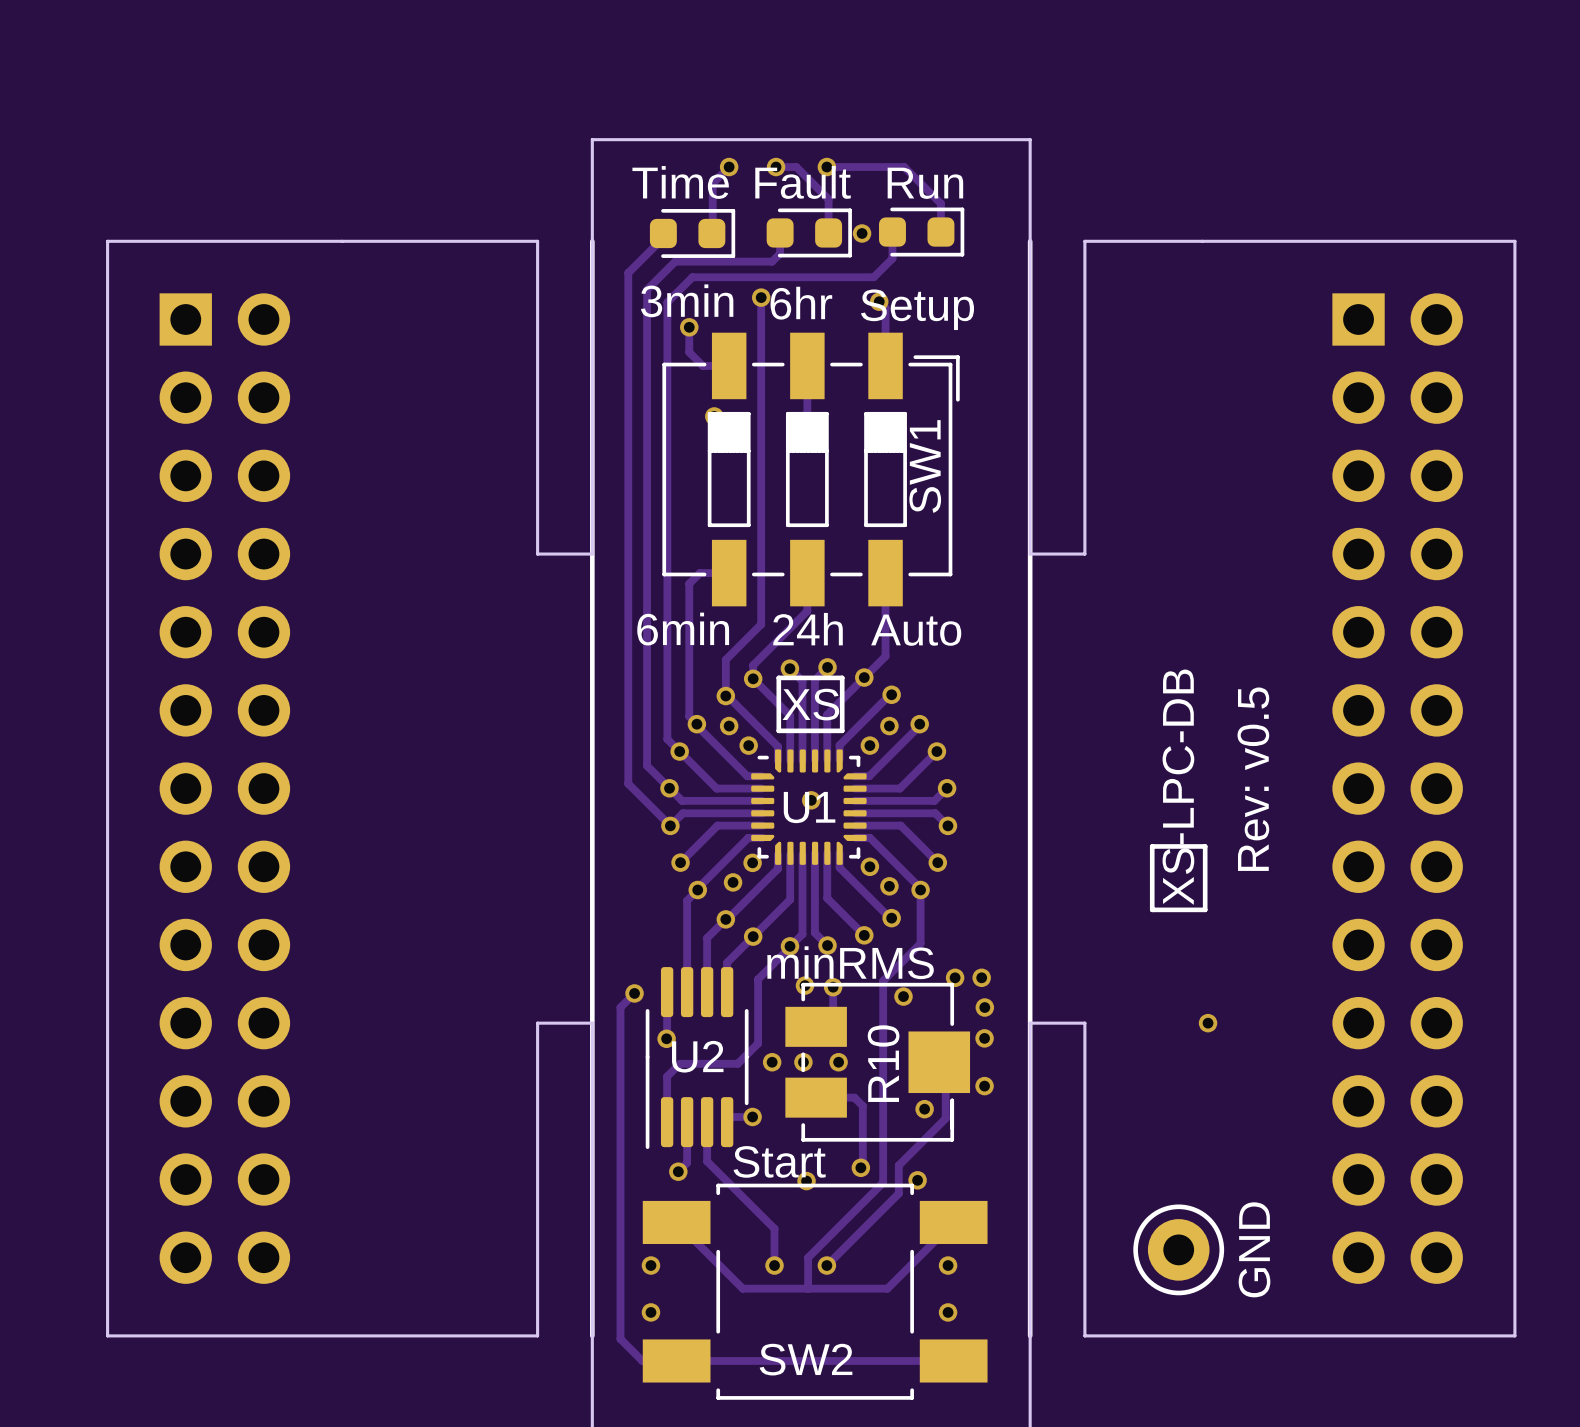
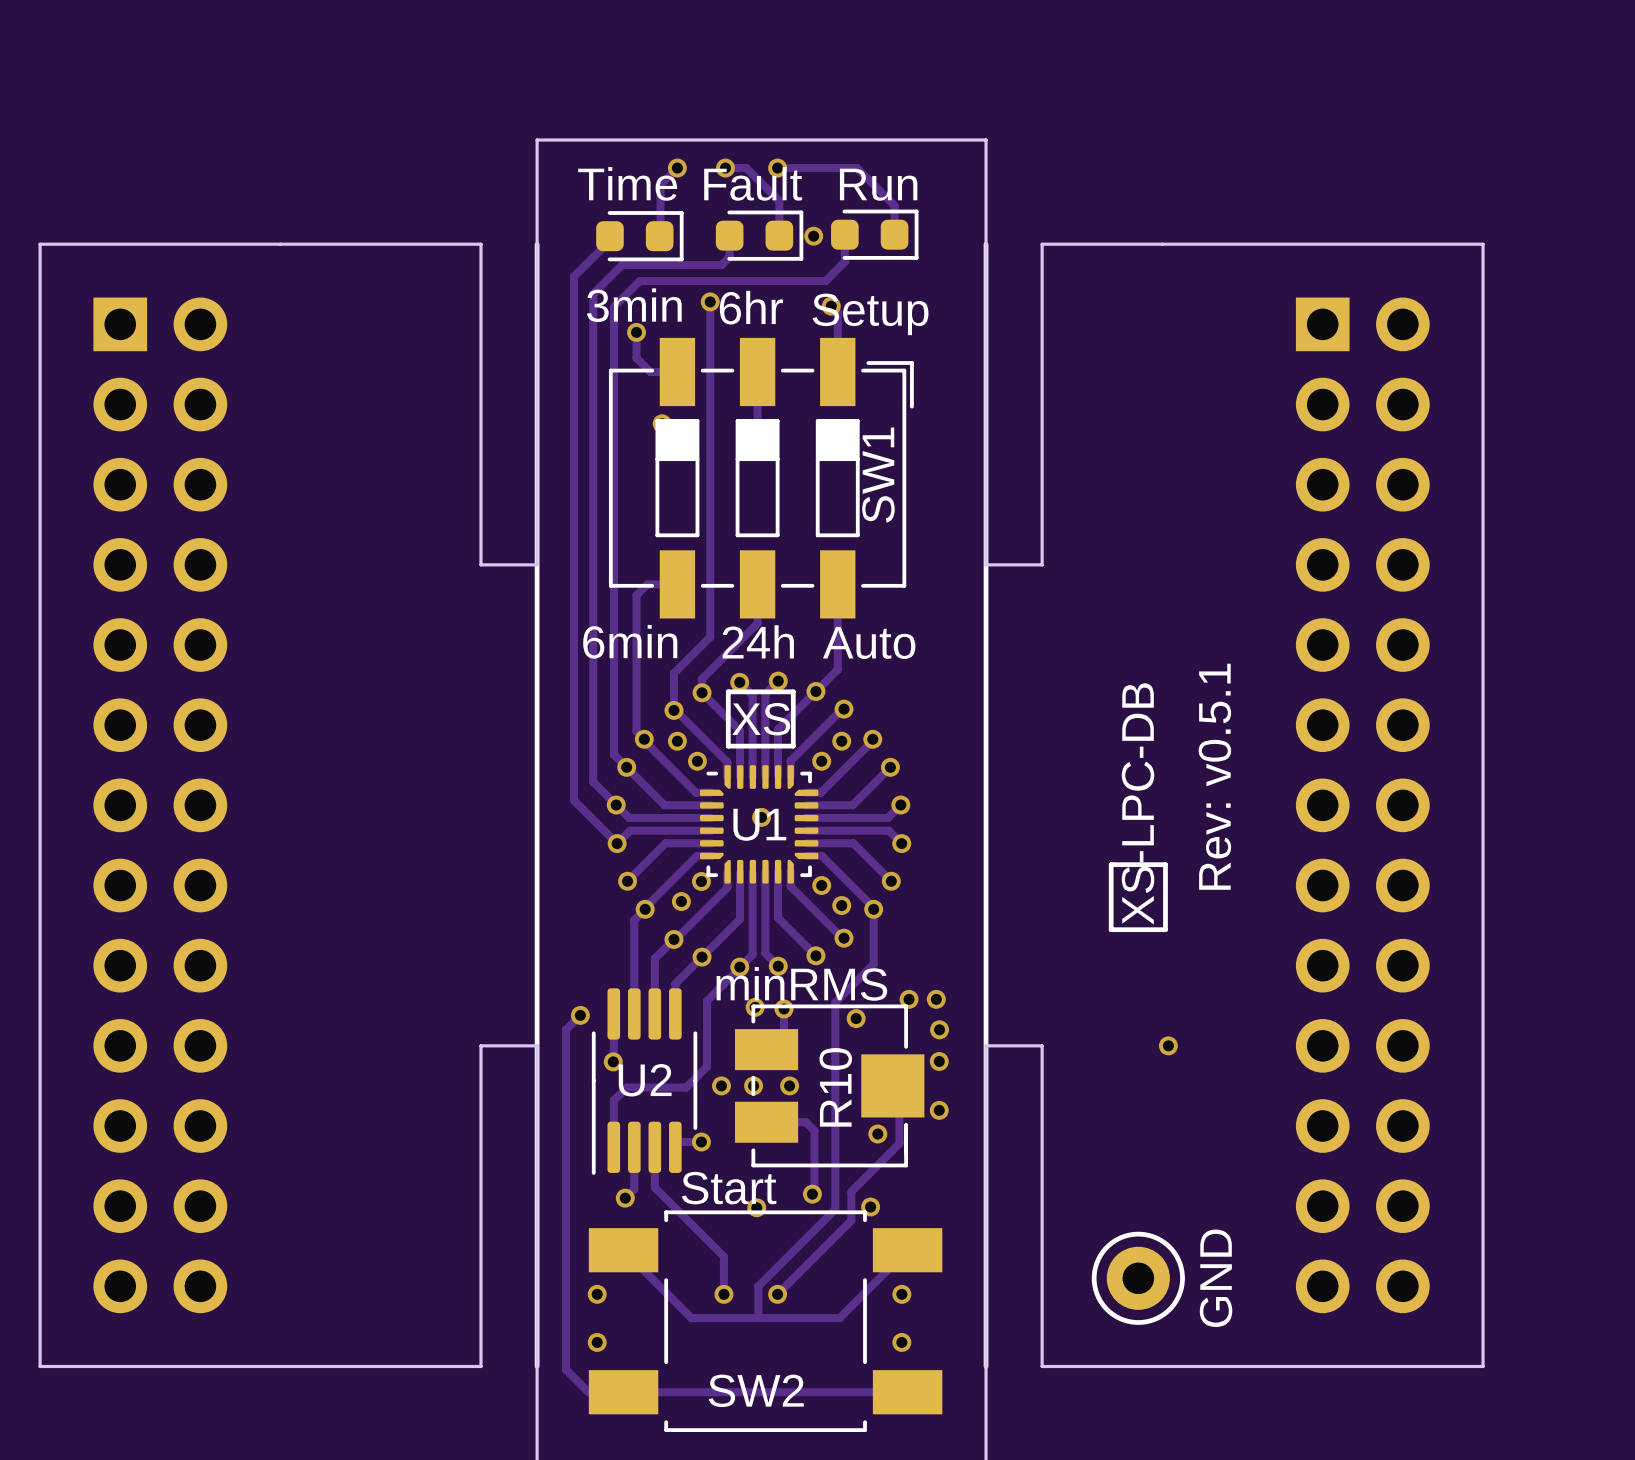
text: Rev: v0.5 (1253, 779) -> Rev: v0.5.1 (1214, 776)

